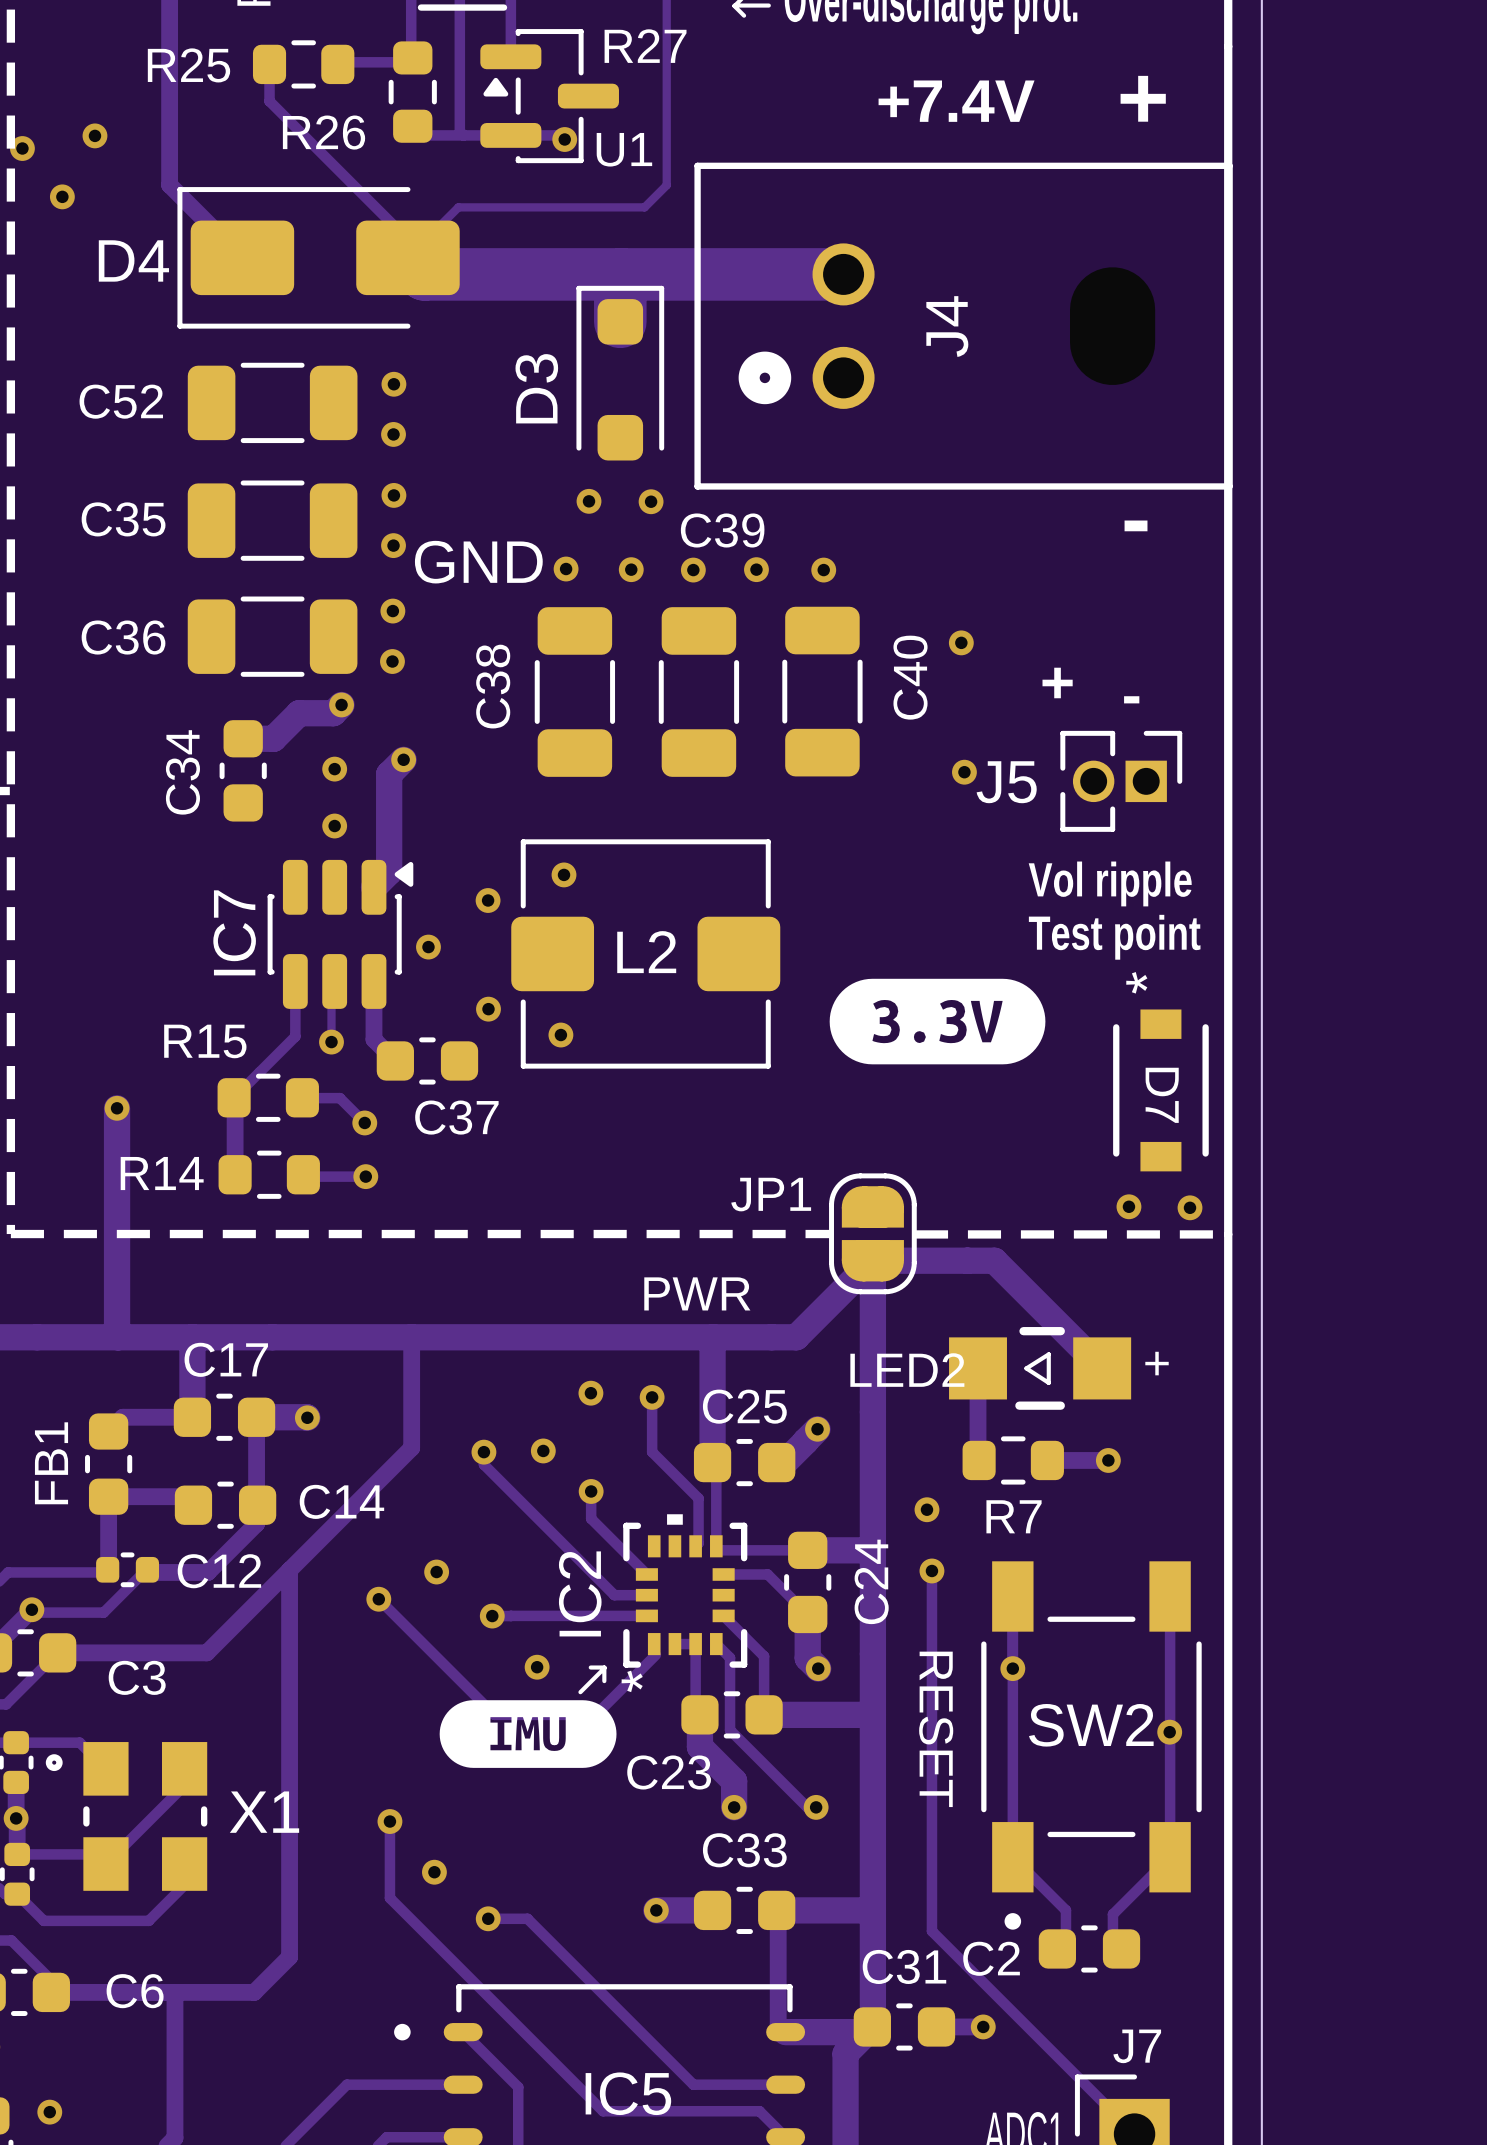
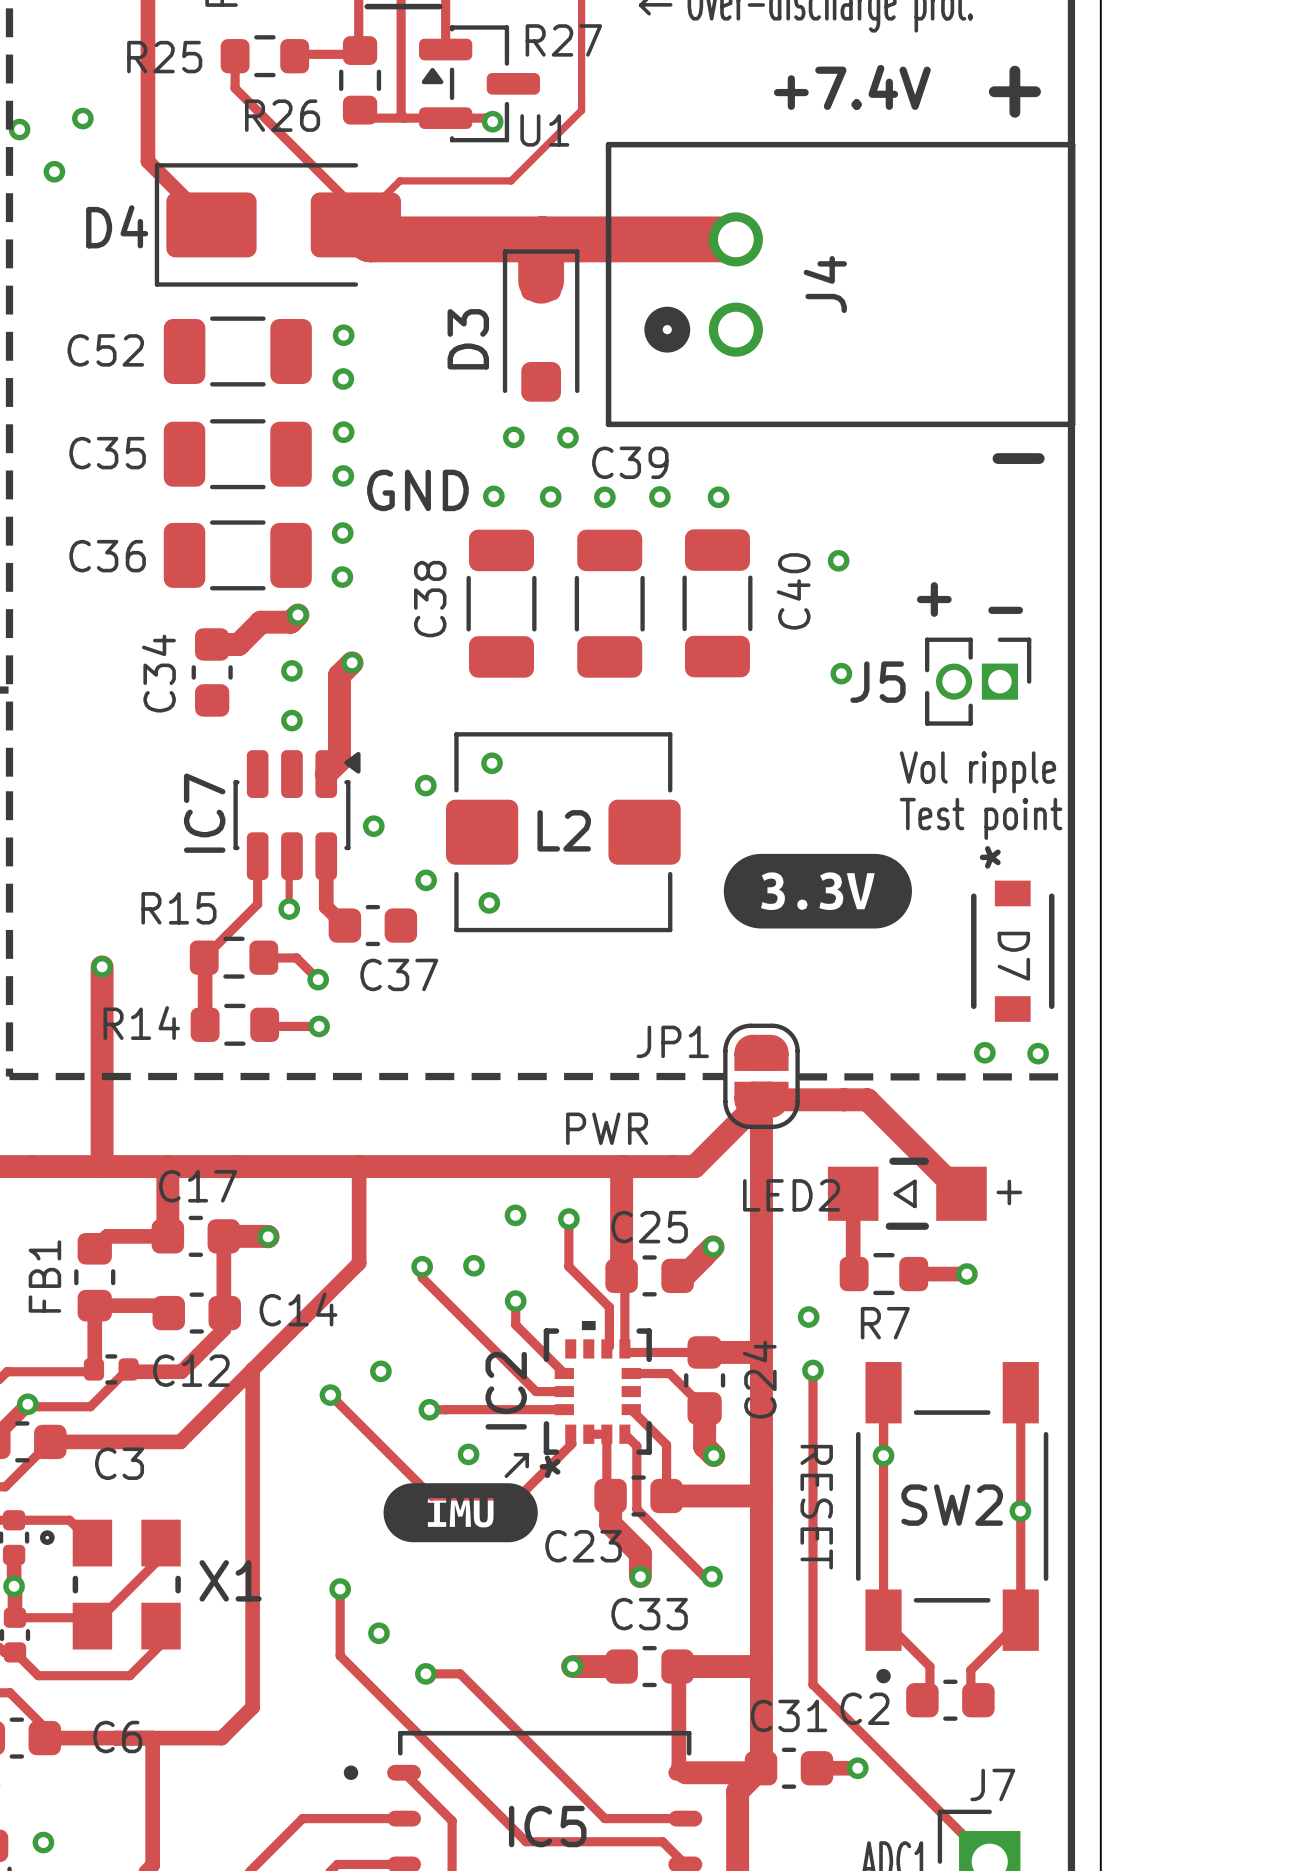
track: (666, 126) (666, 185) (644, 207) (585, 207) -> (581, 110) (511, 180)

